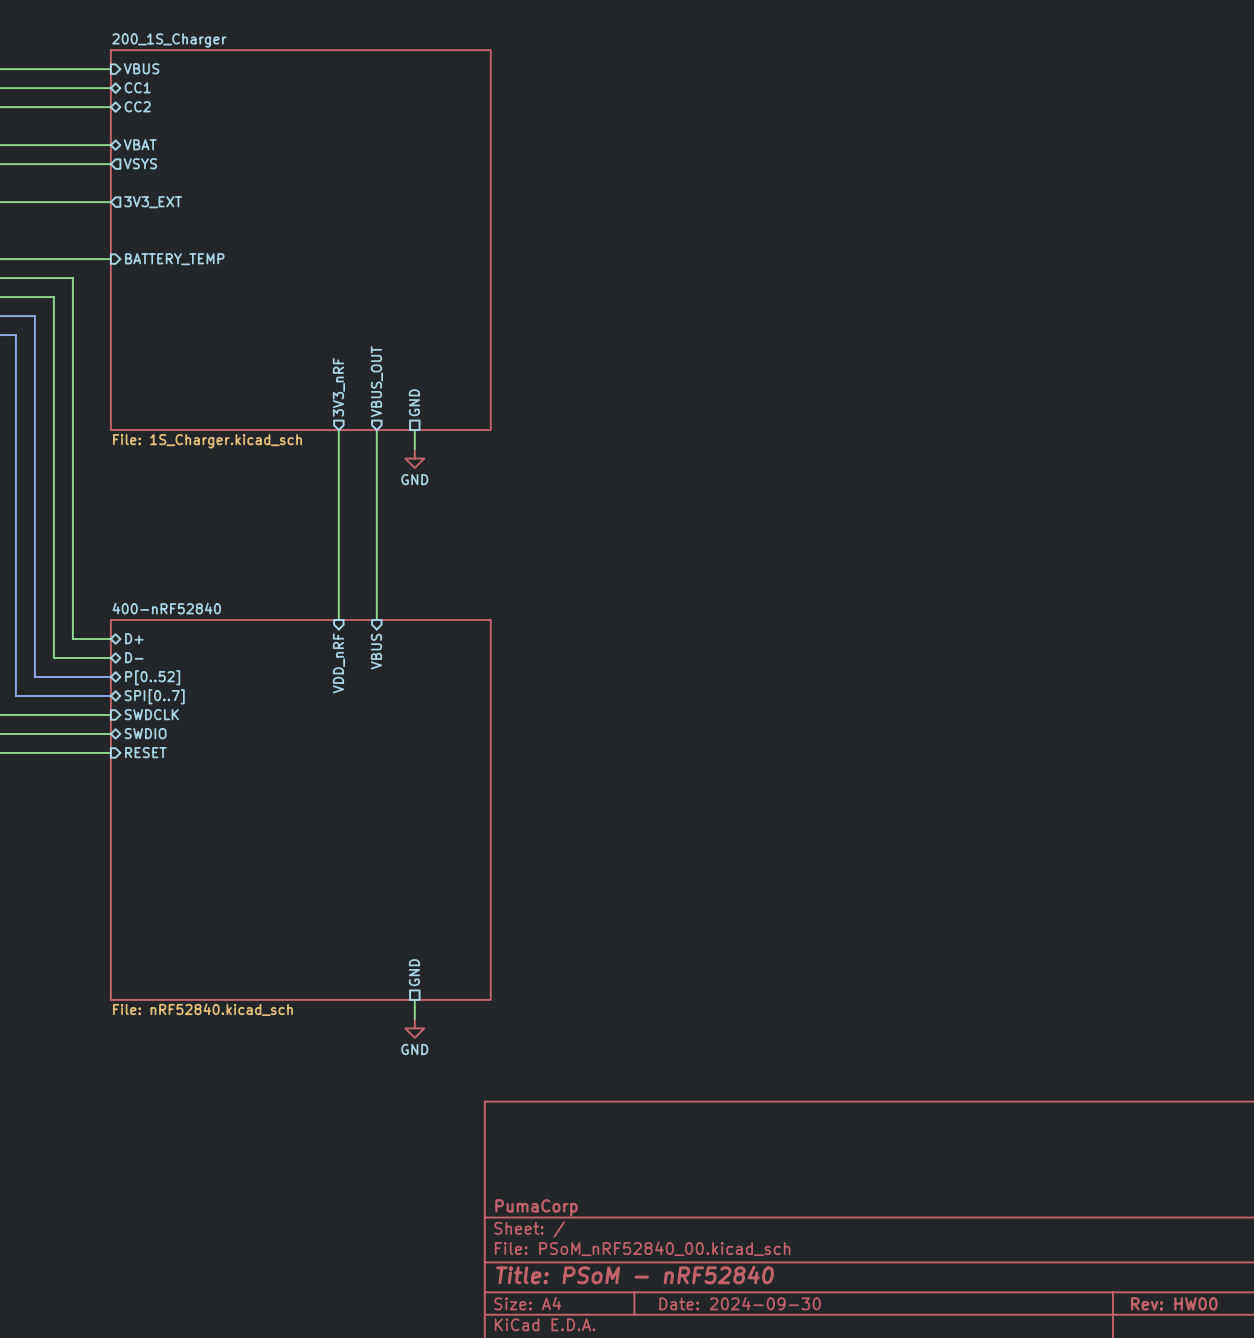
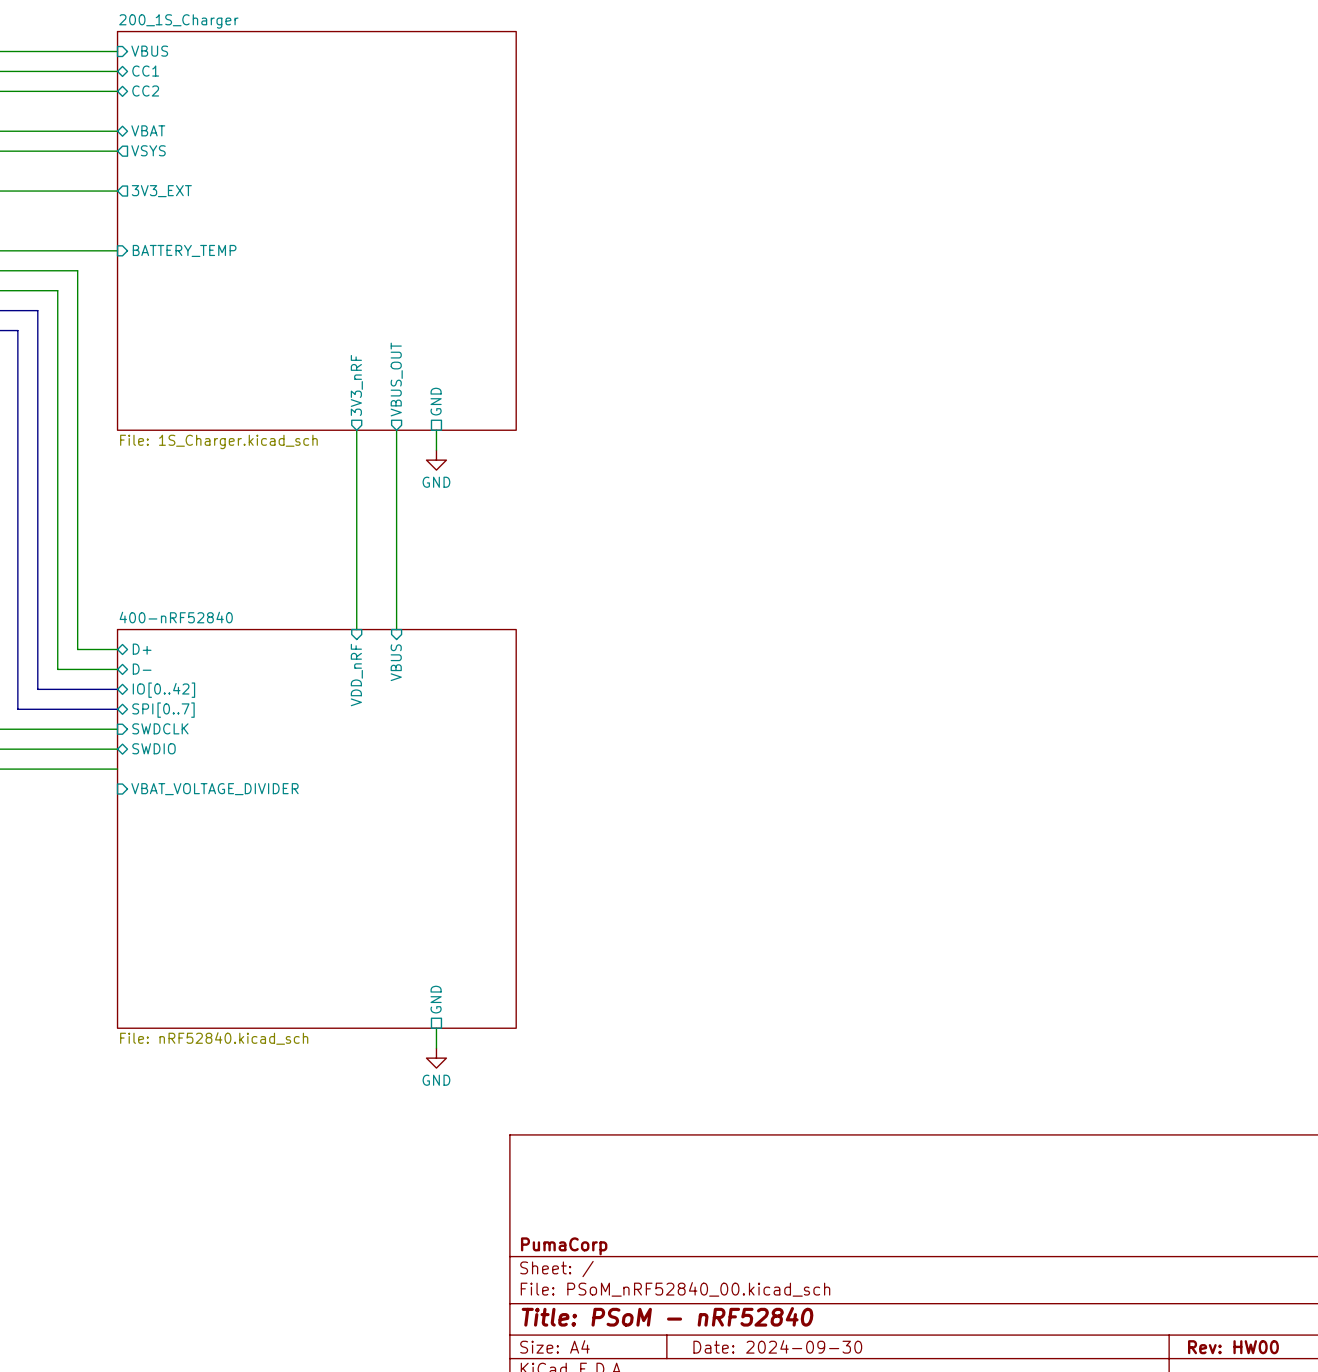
sheet pin: P[0..52] (152, 677) -> IO[0..42] (163, 690)
sheet pin: RESET (145, 752) -> none
sheet pin: none -> VBAT_VOLTAGE_DIVIDER (214, 789)

